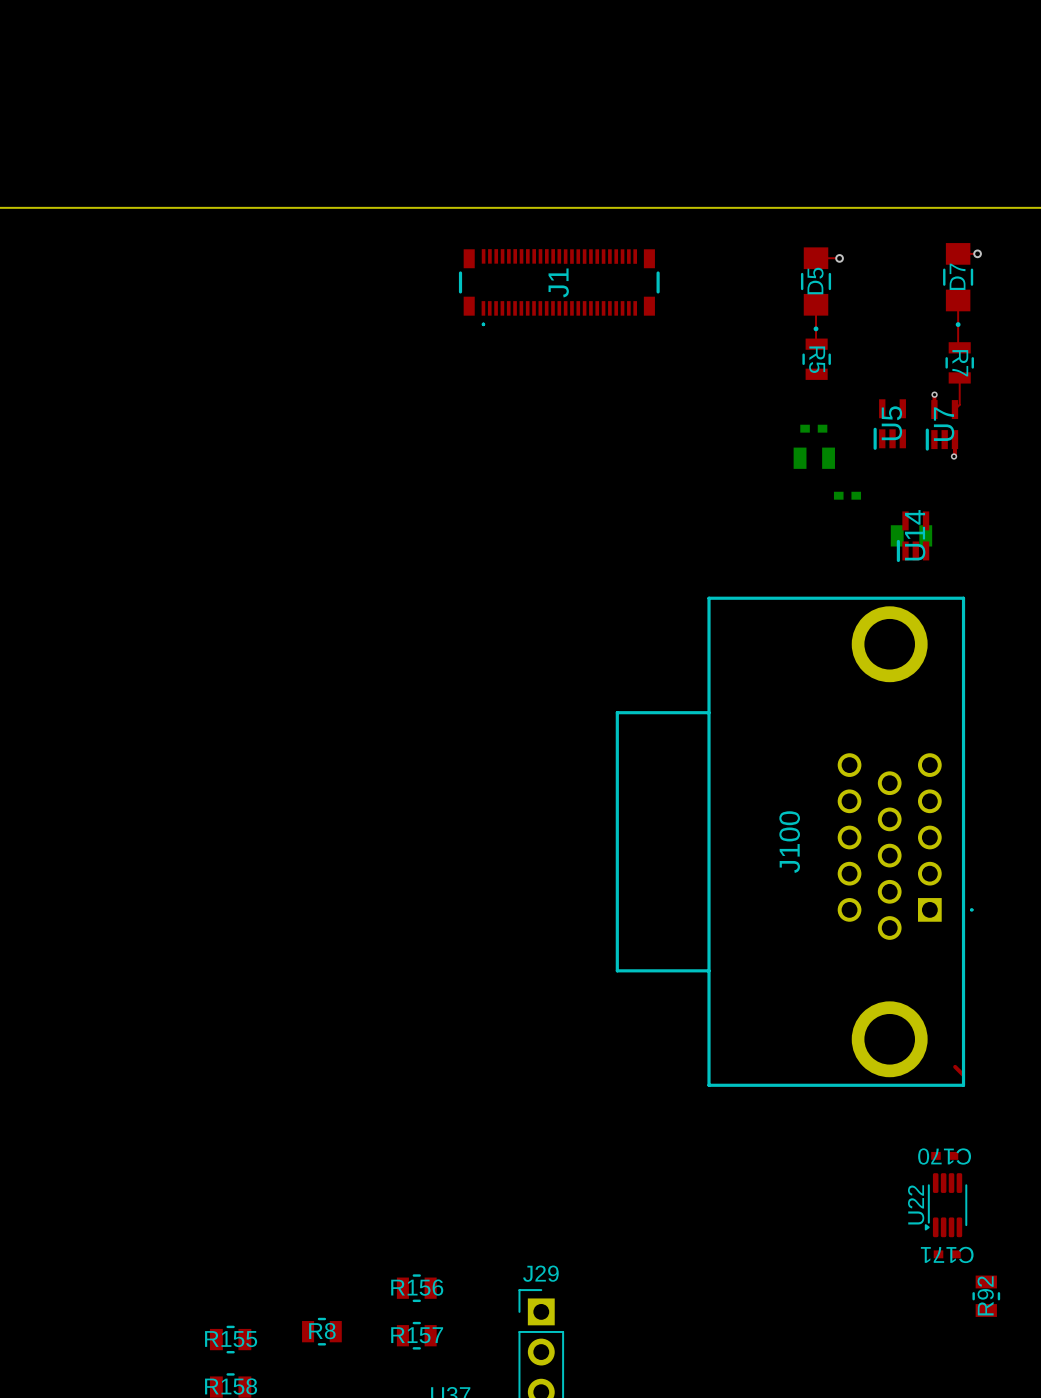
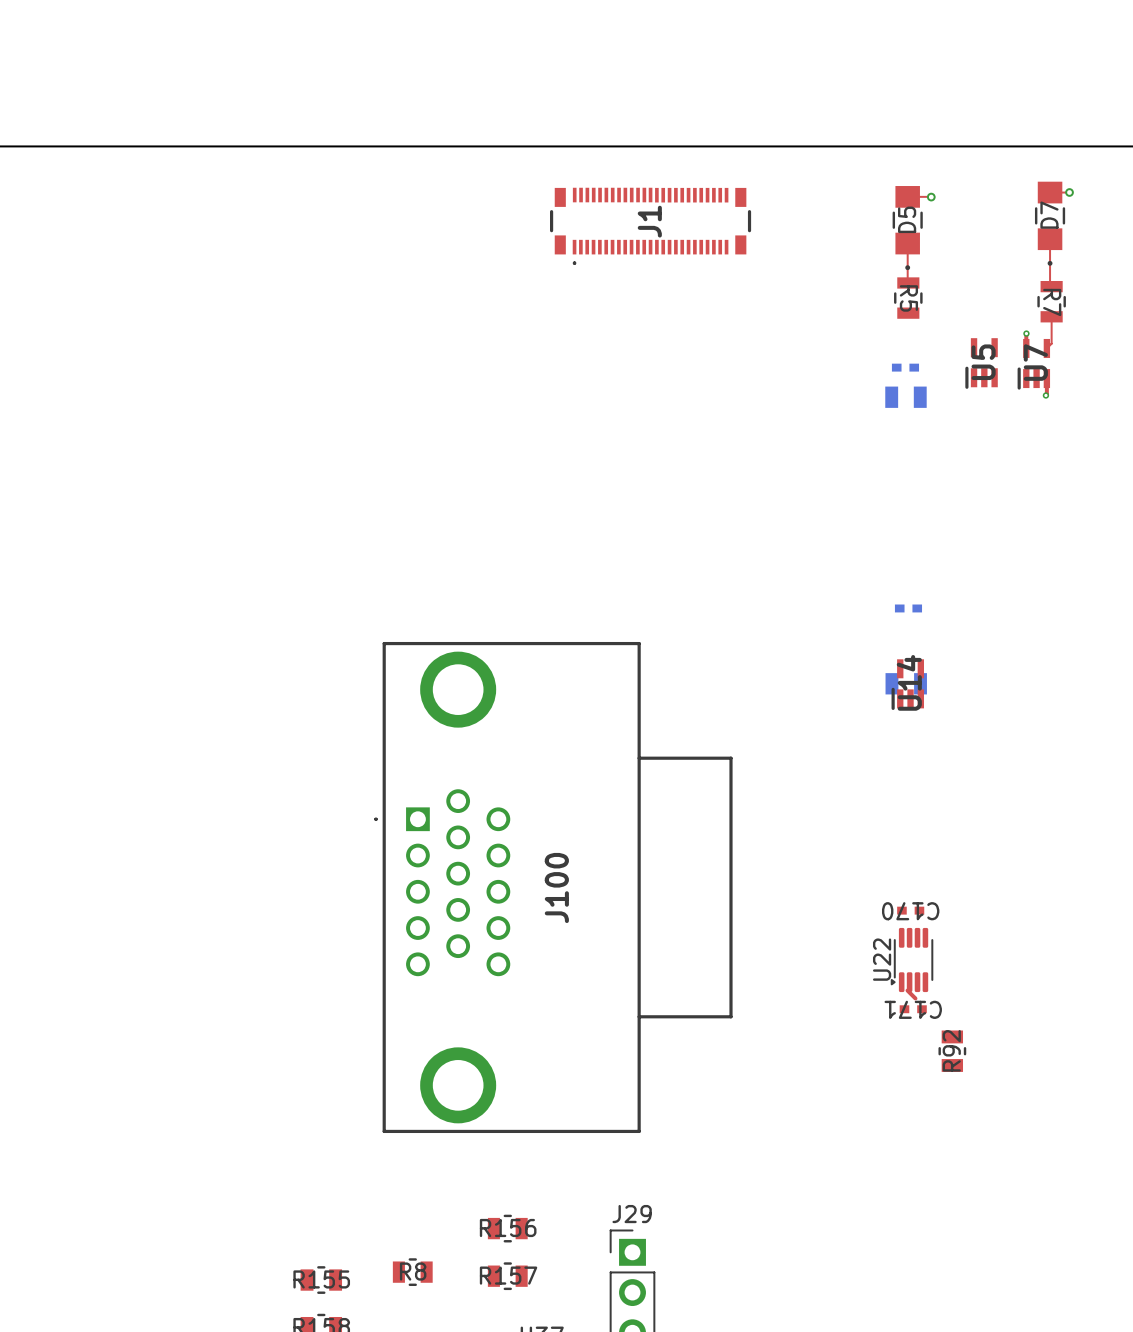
part position: (847, 495) -> (908, 608)
part position: (911, 535) -> (906, 683)
U14 position: (913, 536) -> (907, 684)
J100 rotation: 0° (794, 841) -> 180° (553, 887)
J100 position: (794, 841) -> (553, 887)
top track: (955, 1066) (963, 1074) -> (907, 990) (915, 998)
C170 position: (944, 1155) -> (910, 910)
U22 position: (946, 1205) -> (912, 960)
C171 position: (947, 1254) -> (913, 1009)
R92 position: (986, 1296) -> (952, 1051)

